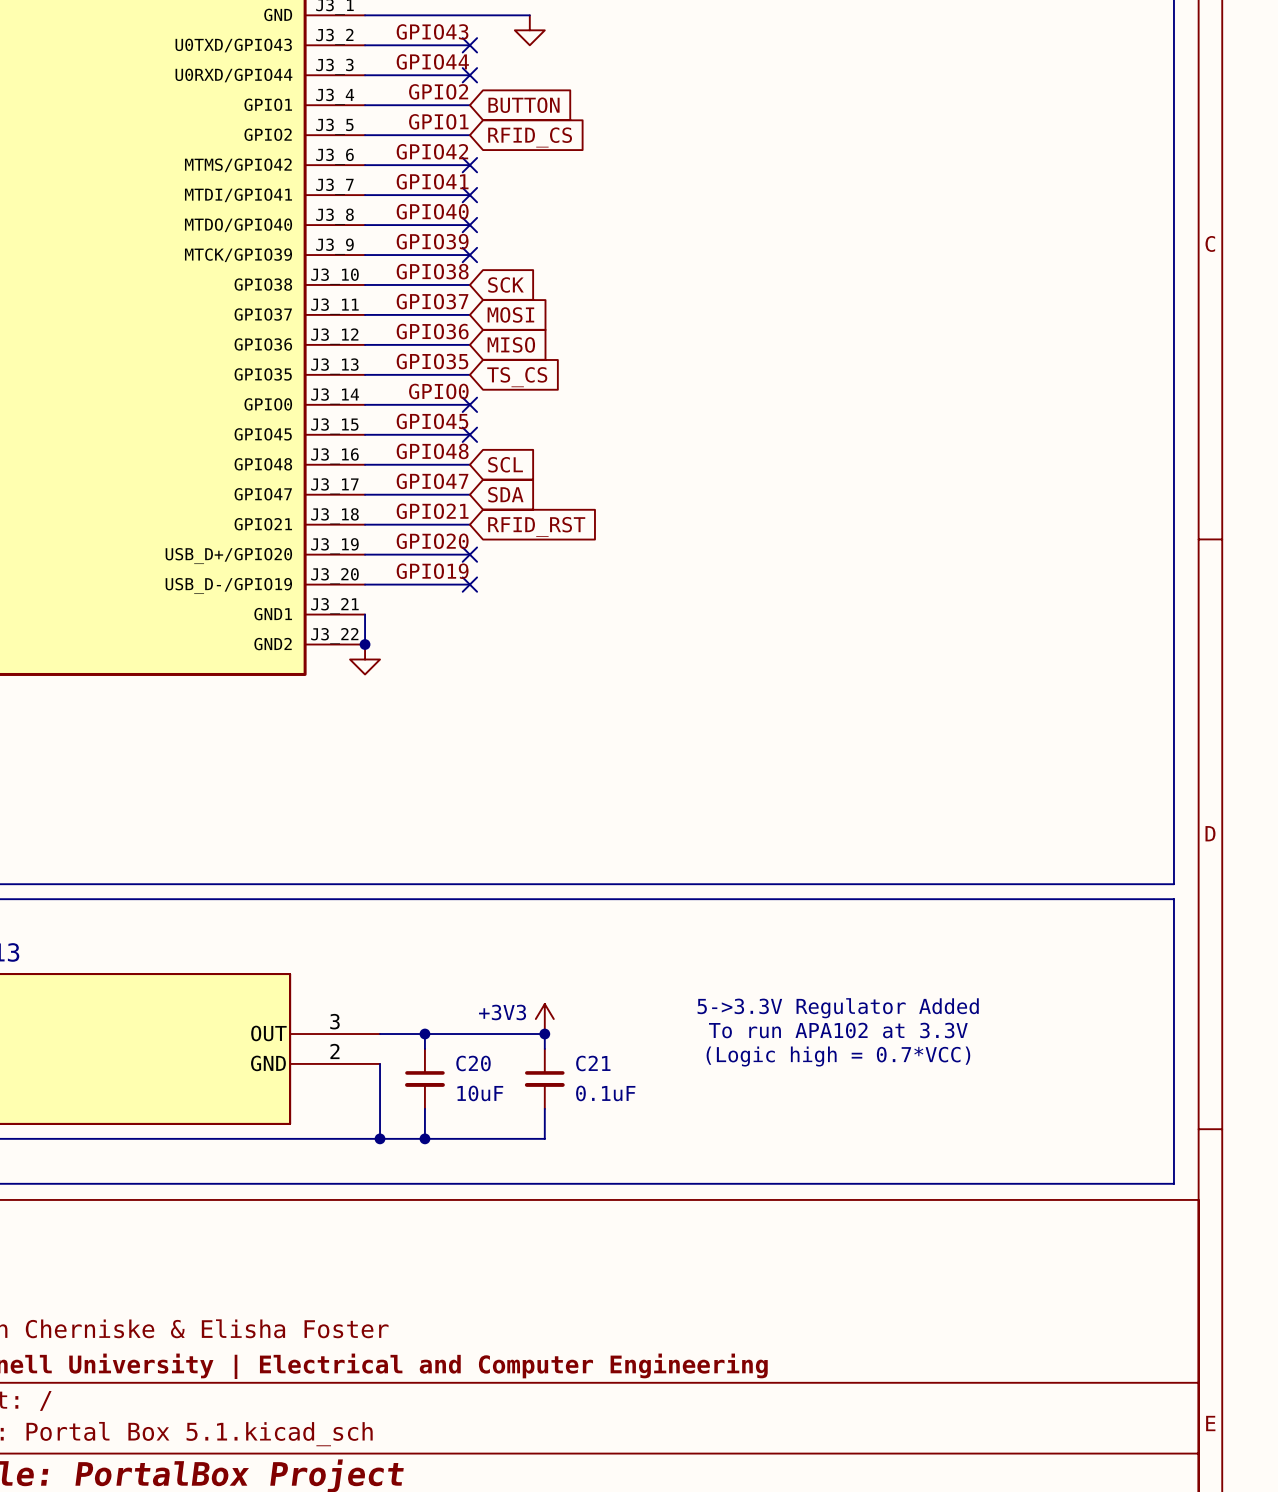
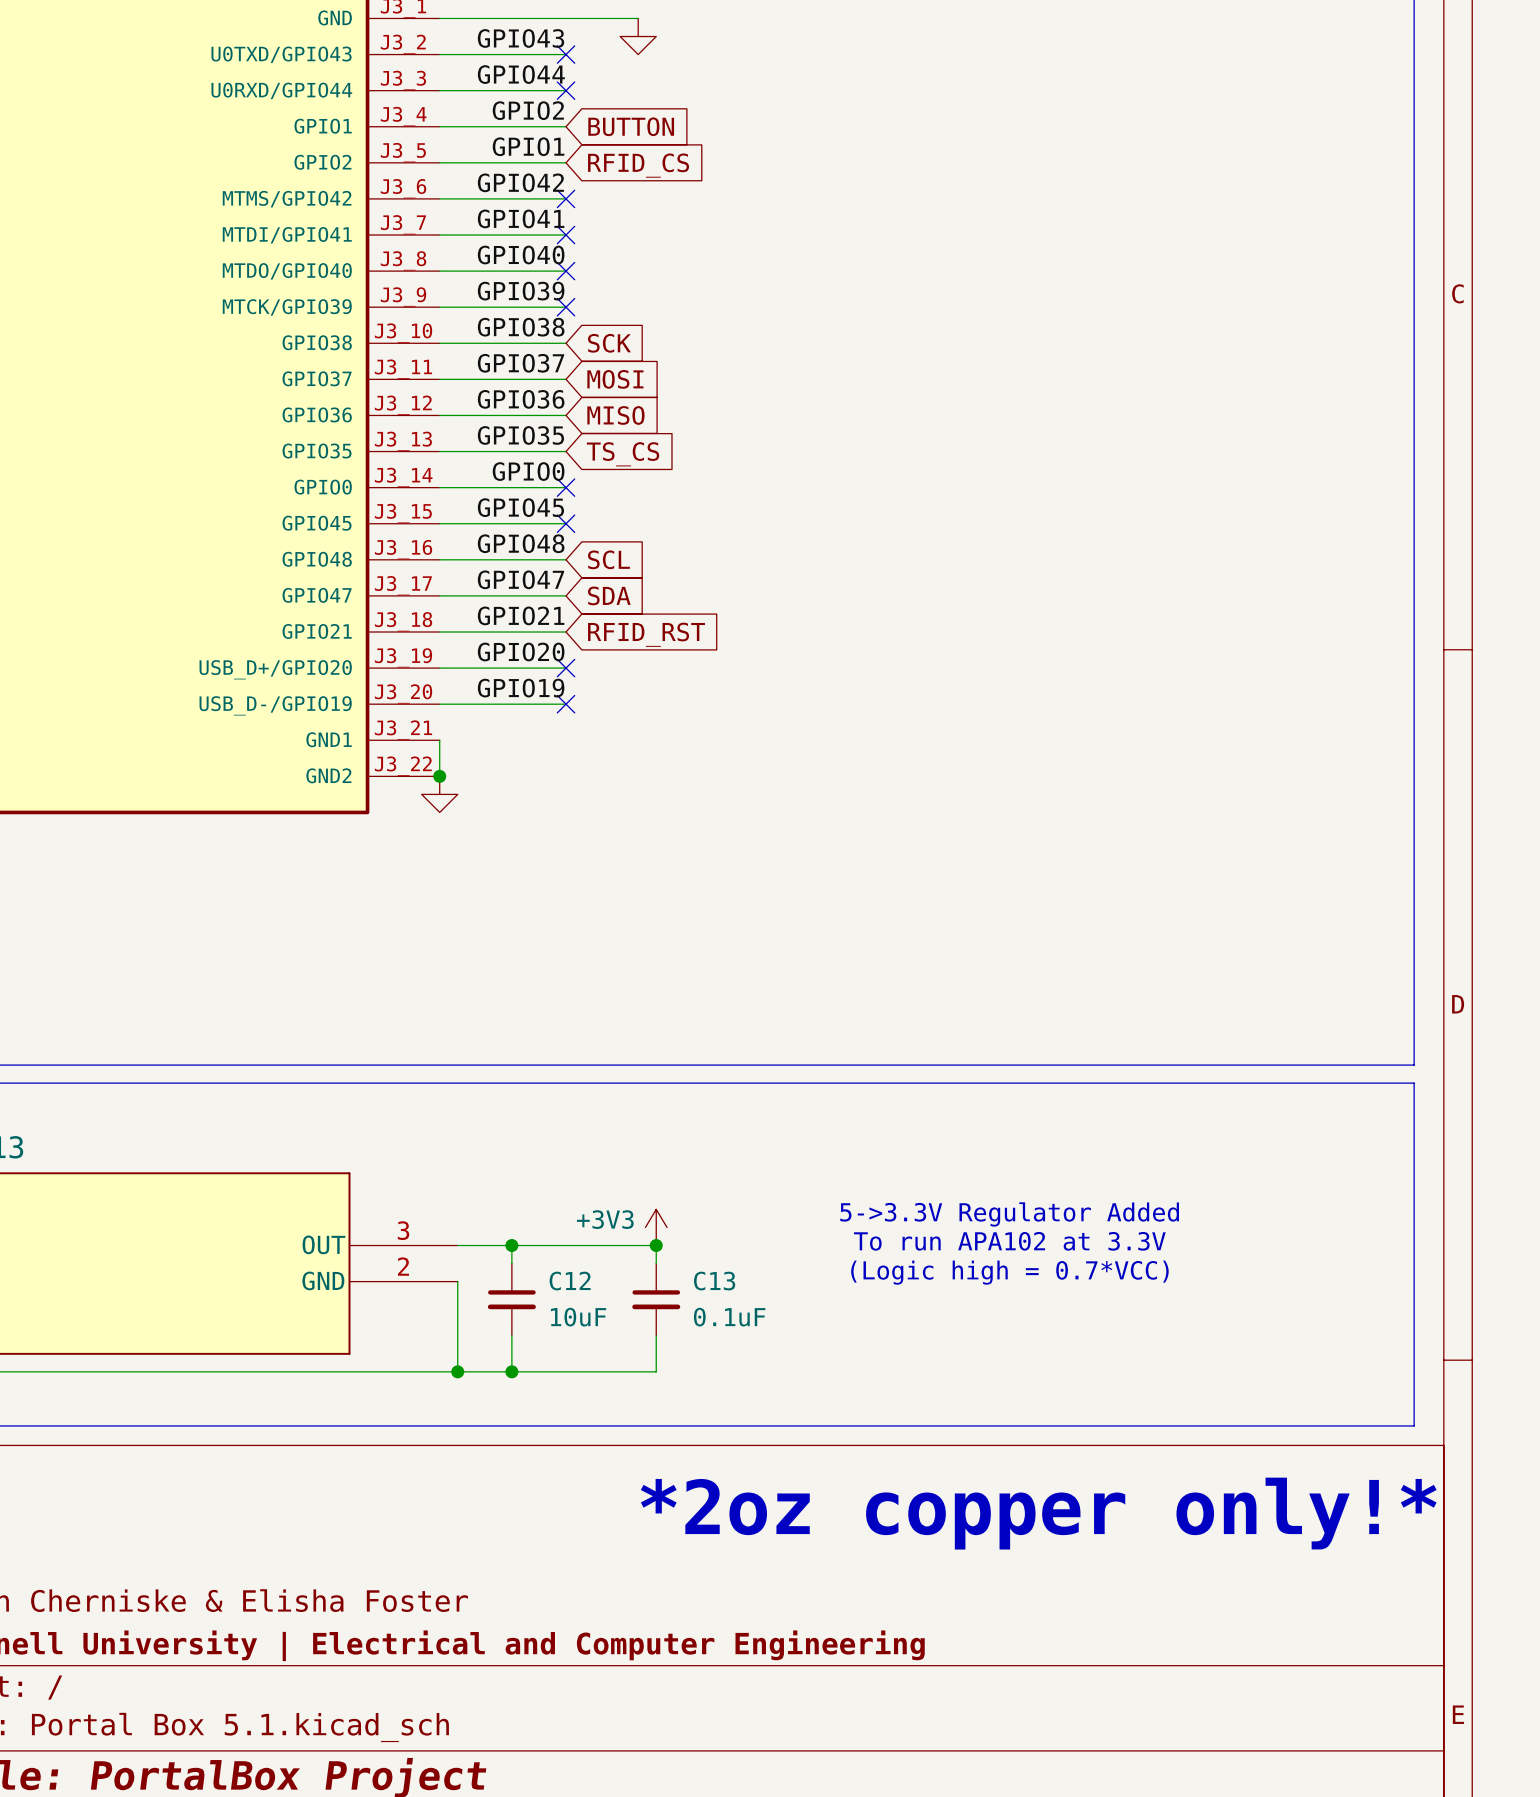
C20 name: C20 (473, 1063) -> C12 (570, 1281)
C21 name: C21 (593, 1063) -> C13 (714, 1281)
text: none -> *2oz copper only!* (1038, 1513)

